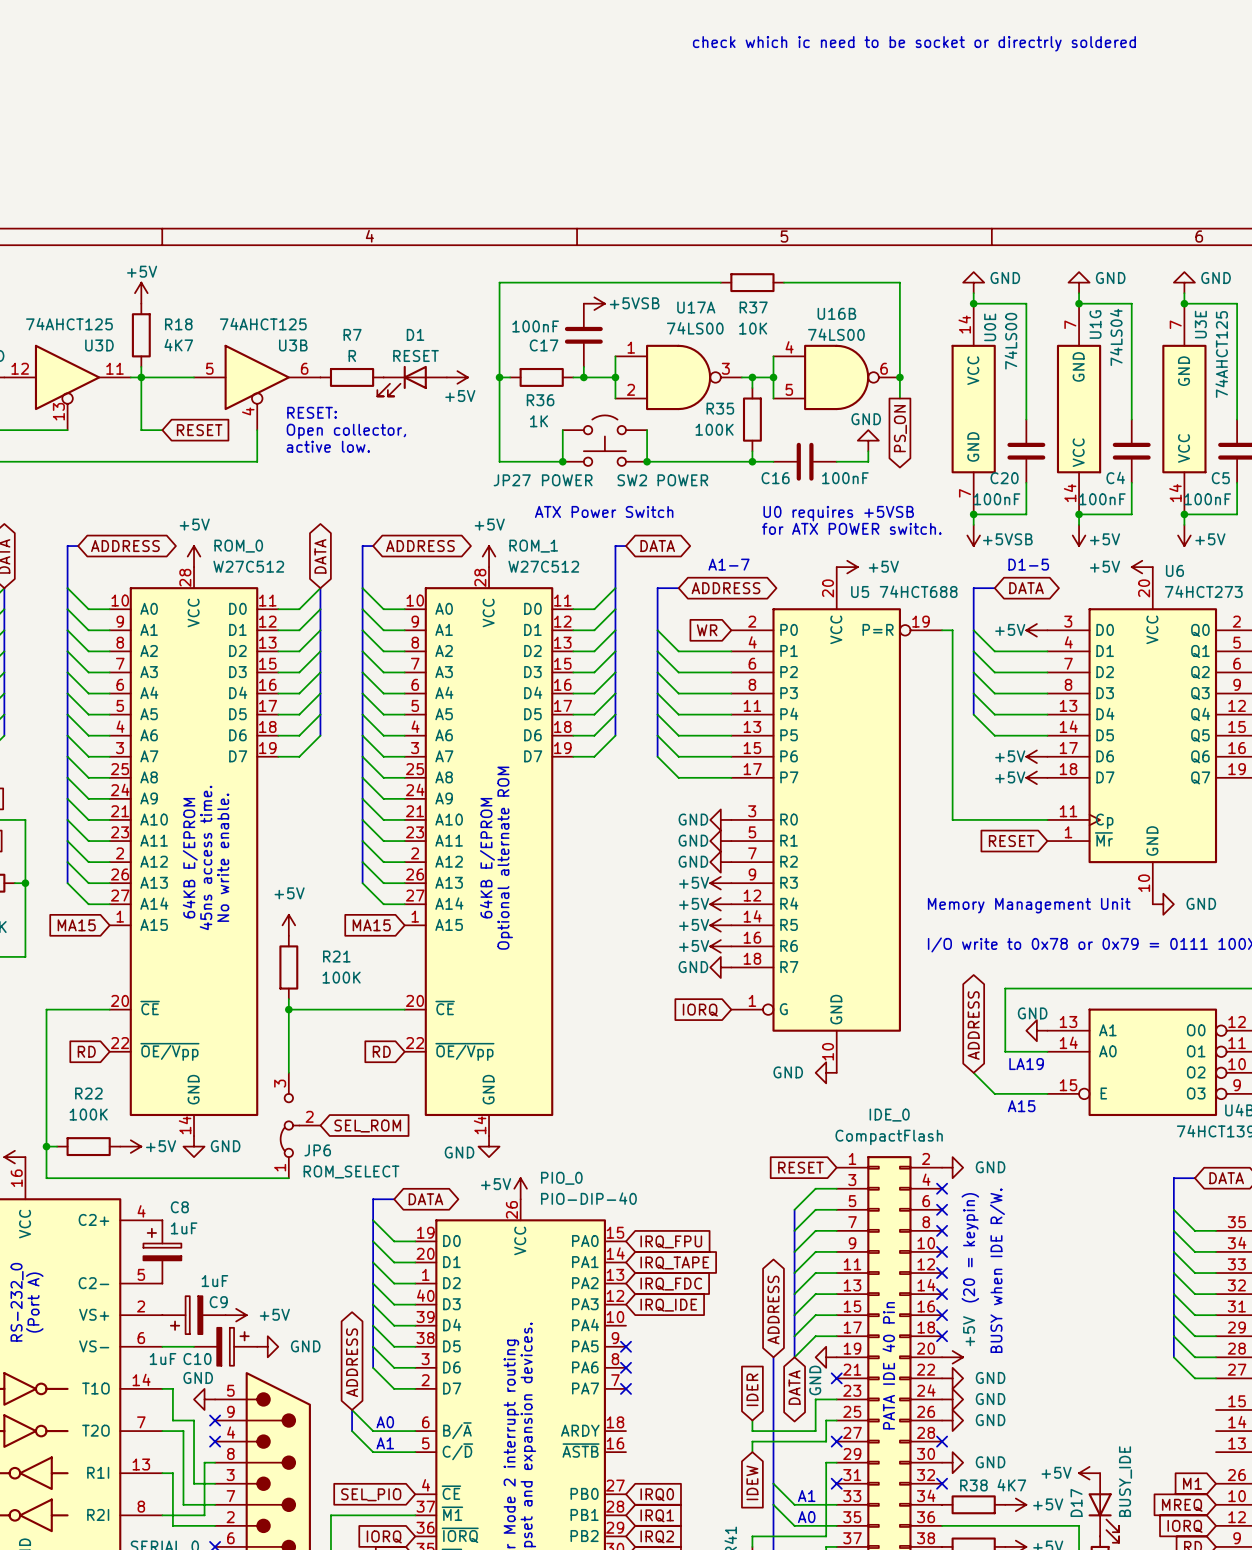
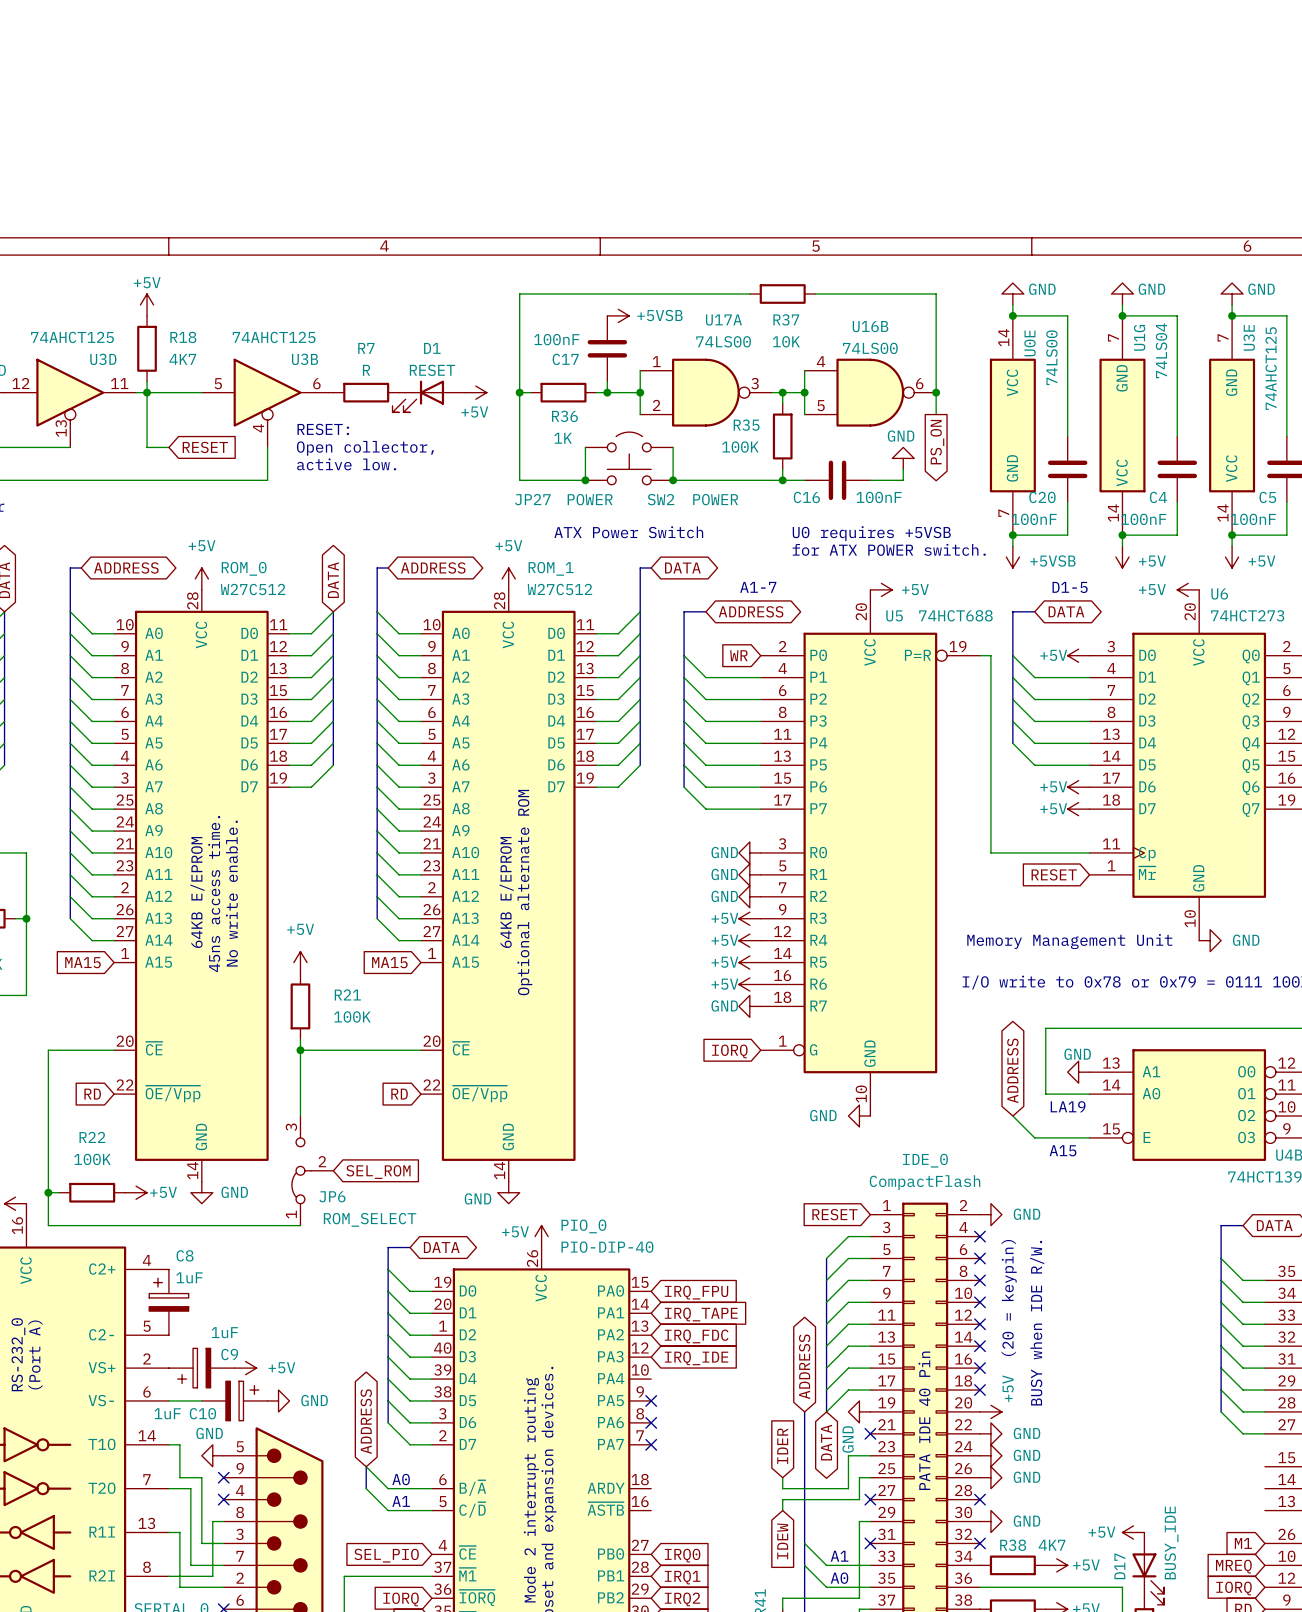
text: check which ic need to be socket or directrly soldered (914, 43) -> none

